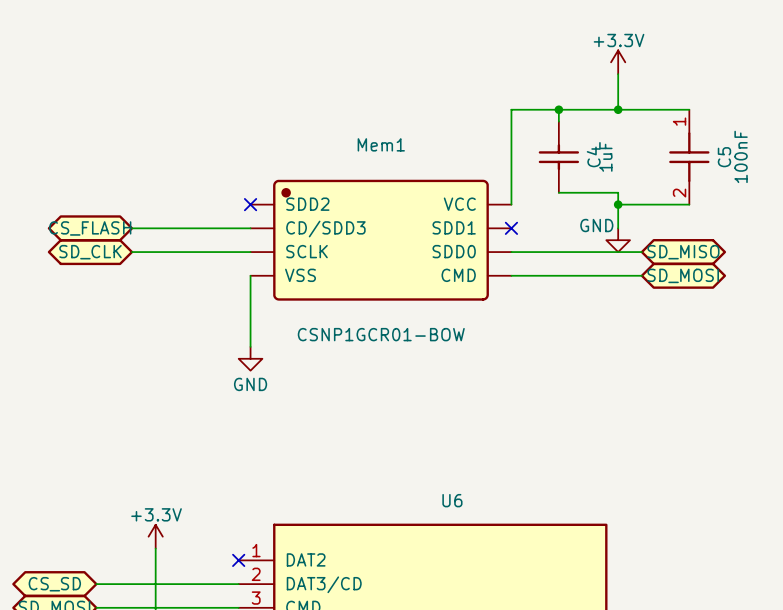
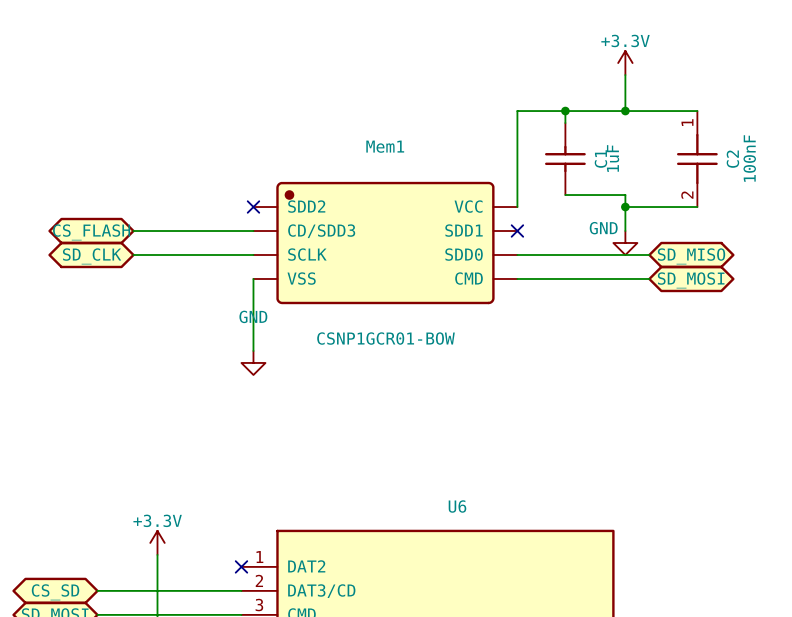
C4 name: C4 (593, 156) -> C1 (600, 159)
C5 name: C5 (724, 157) -> C2 (732, 159)
power symbol text position: GND (250, 384) -> GND (253, 316)

